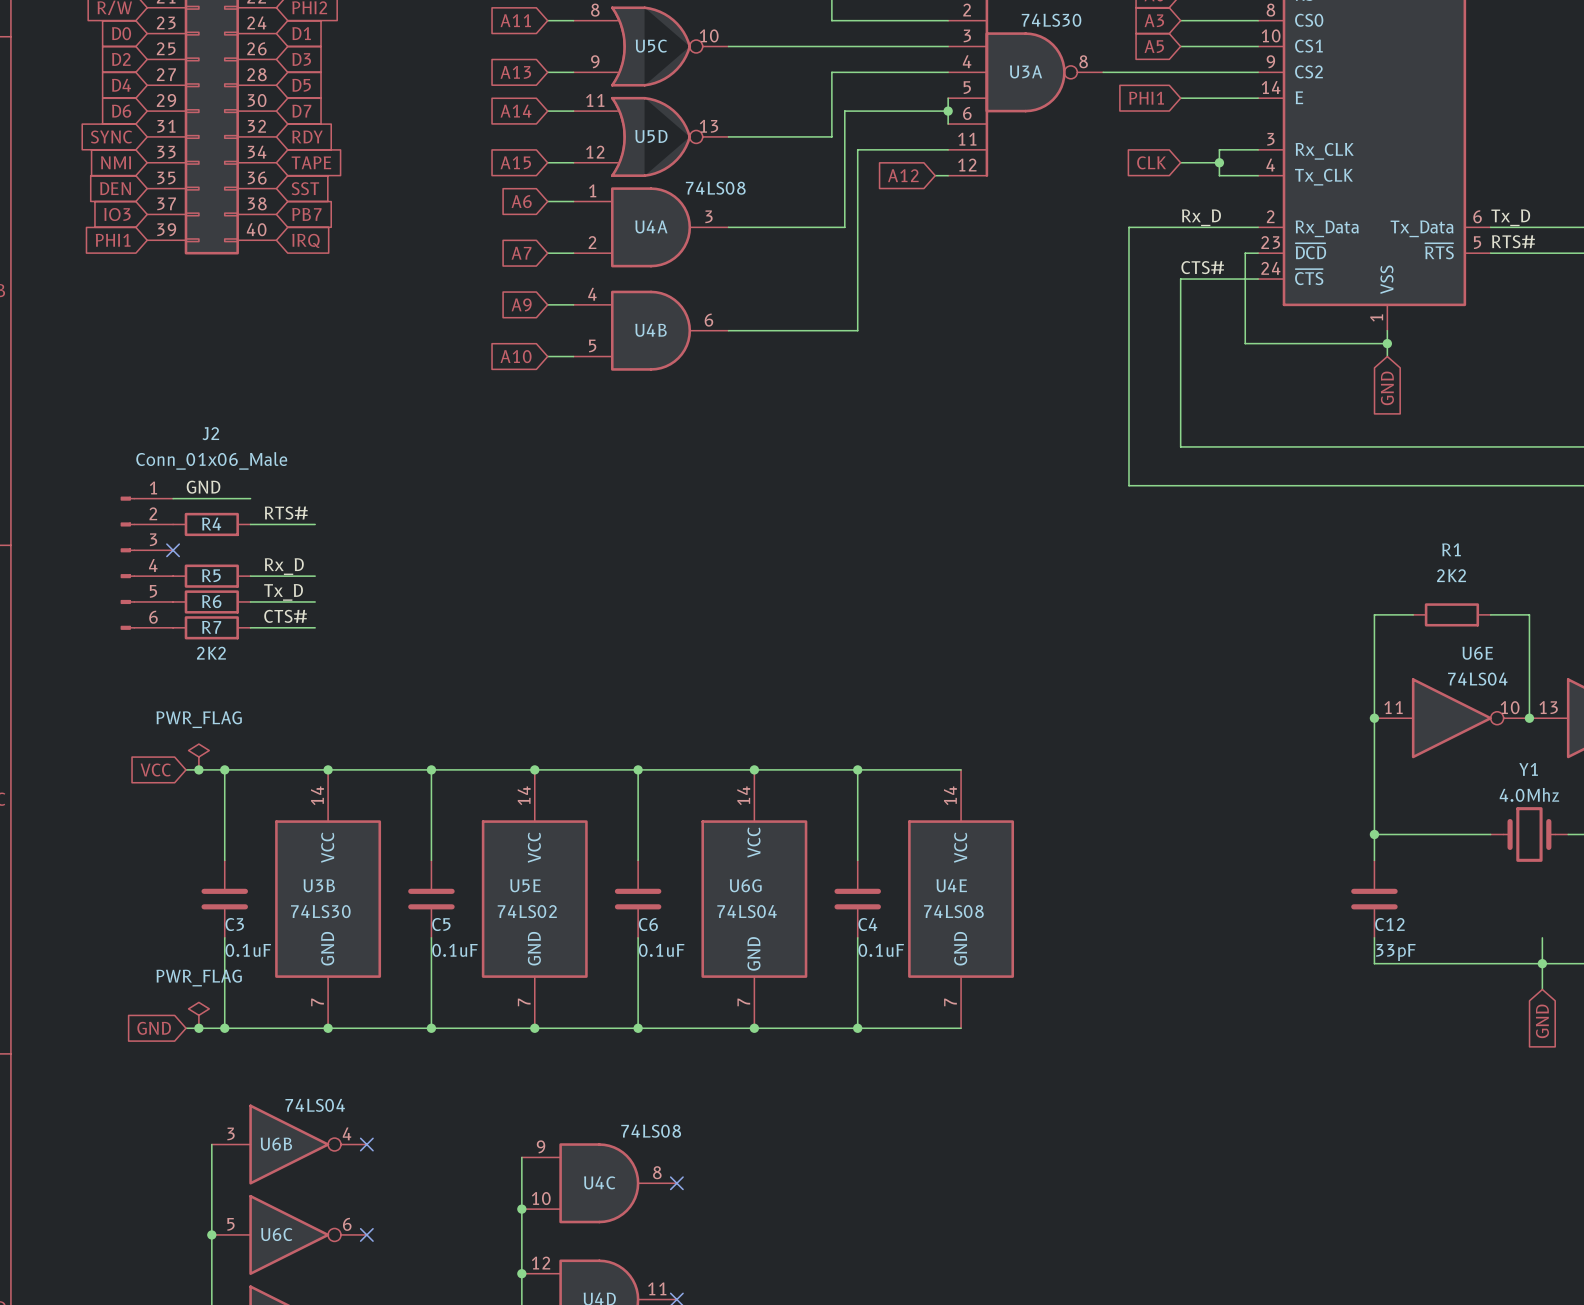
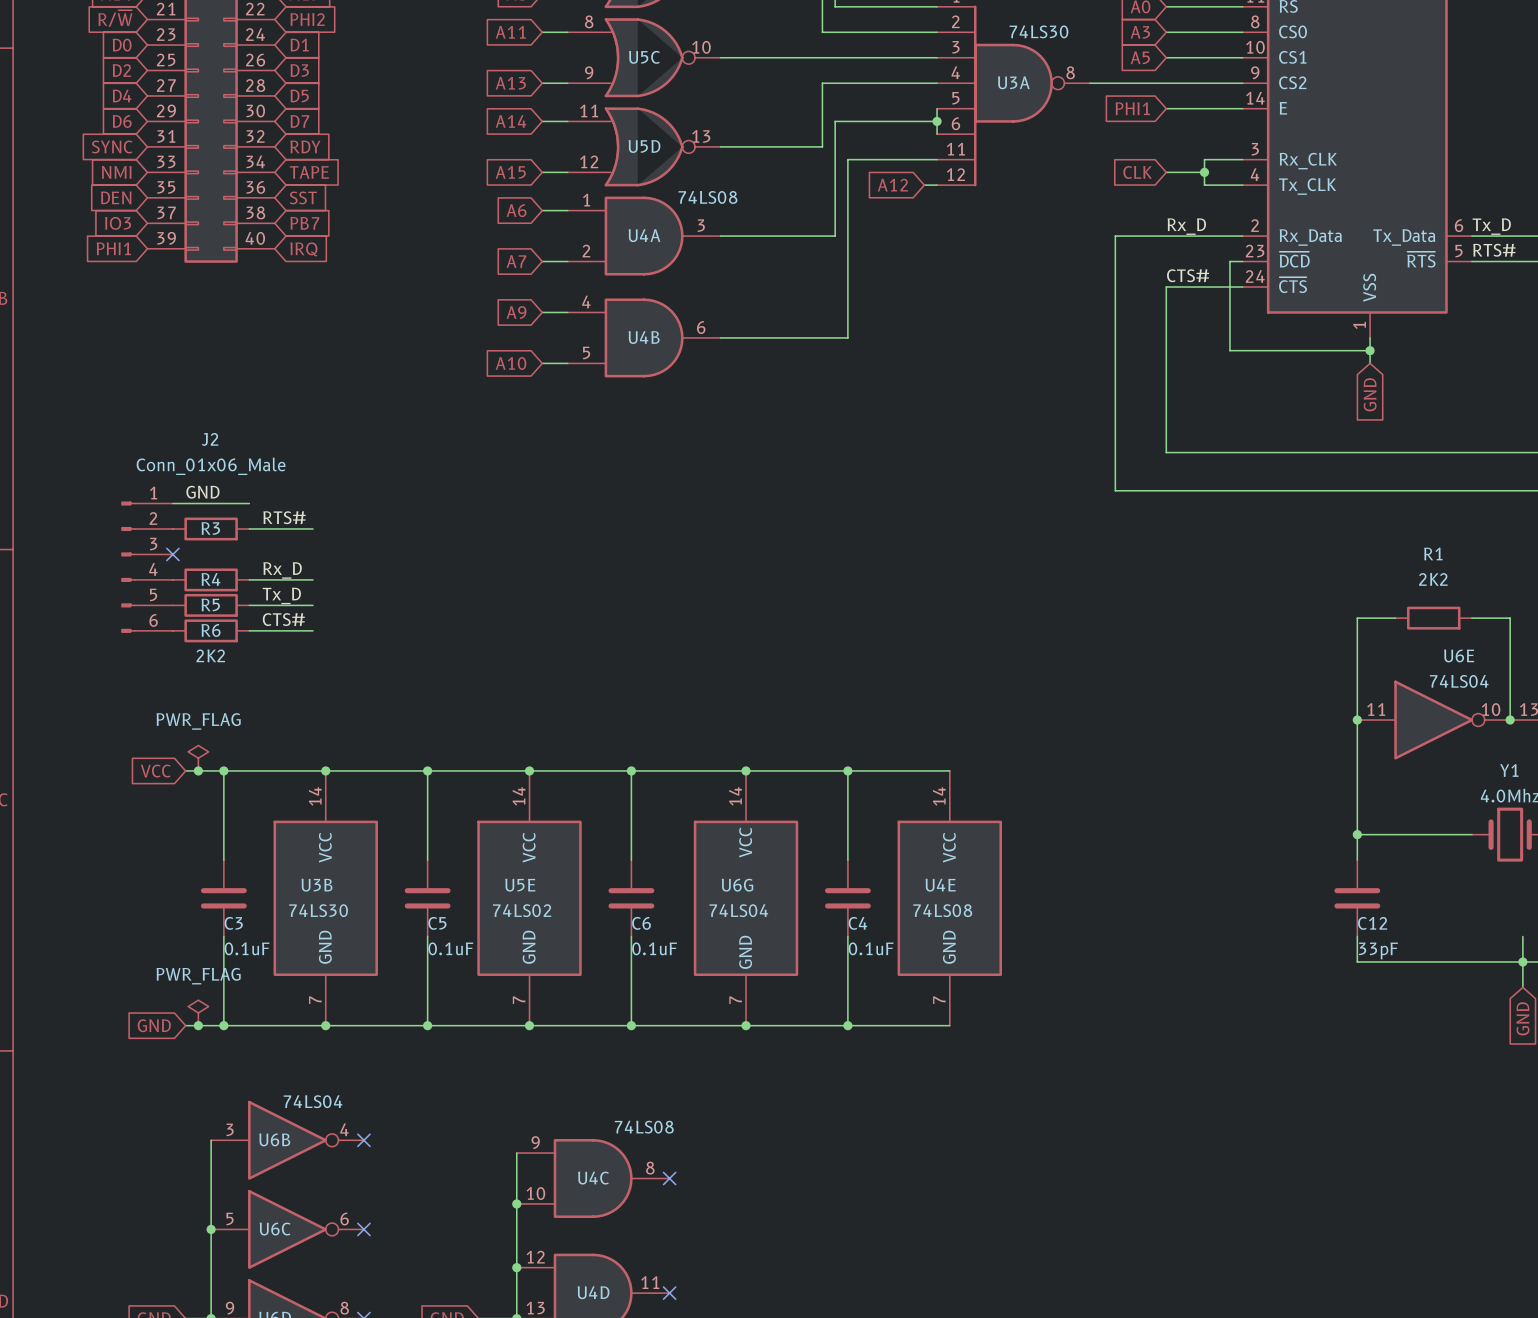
R4 name: R4 (211, 523) -> R3 (210, 528)
R5 name: R5 (211, 575) -> R4 (210, 579)
R6 name: R6 (211, 601) -> R5 (210, 604)
R7 name: R7 (211, 627) -> R6 (211, 630)

